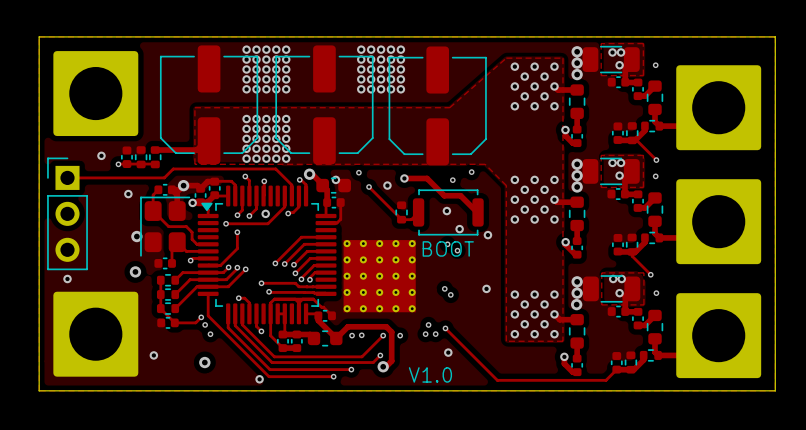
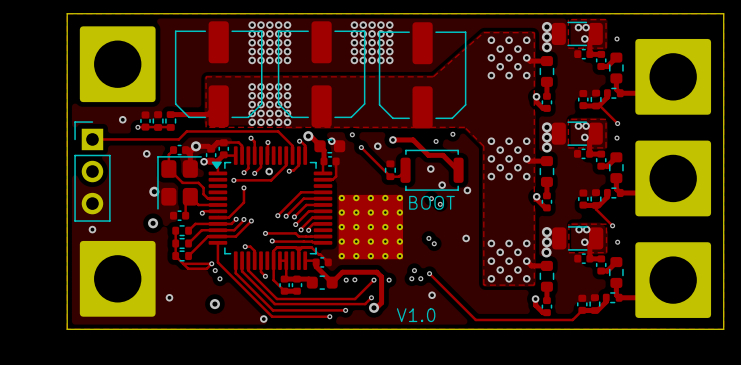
track: none -> (183, 263) (211, 263)
part: (168, 322) -> none

